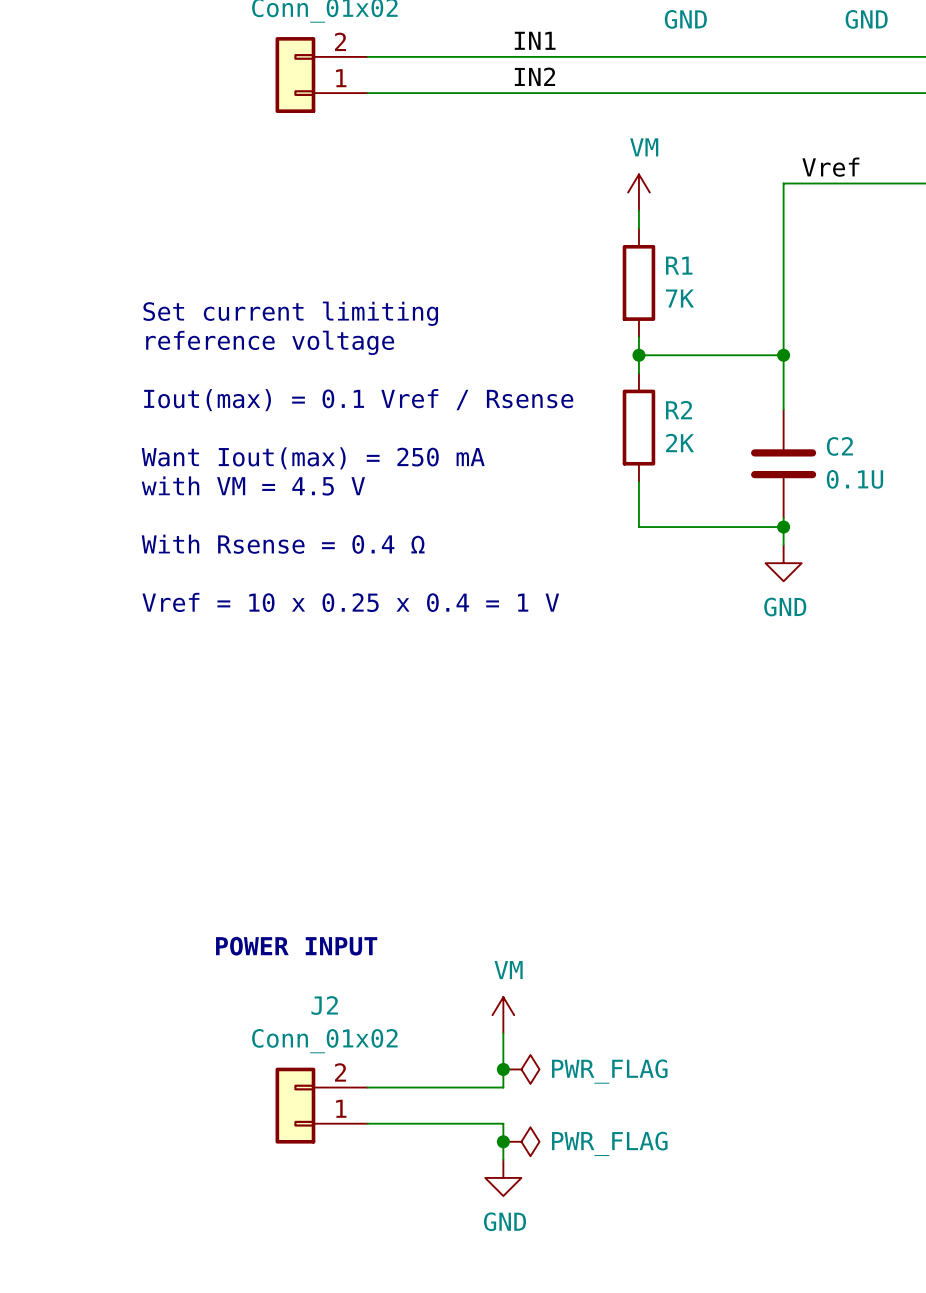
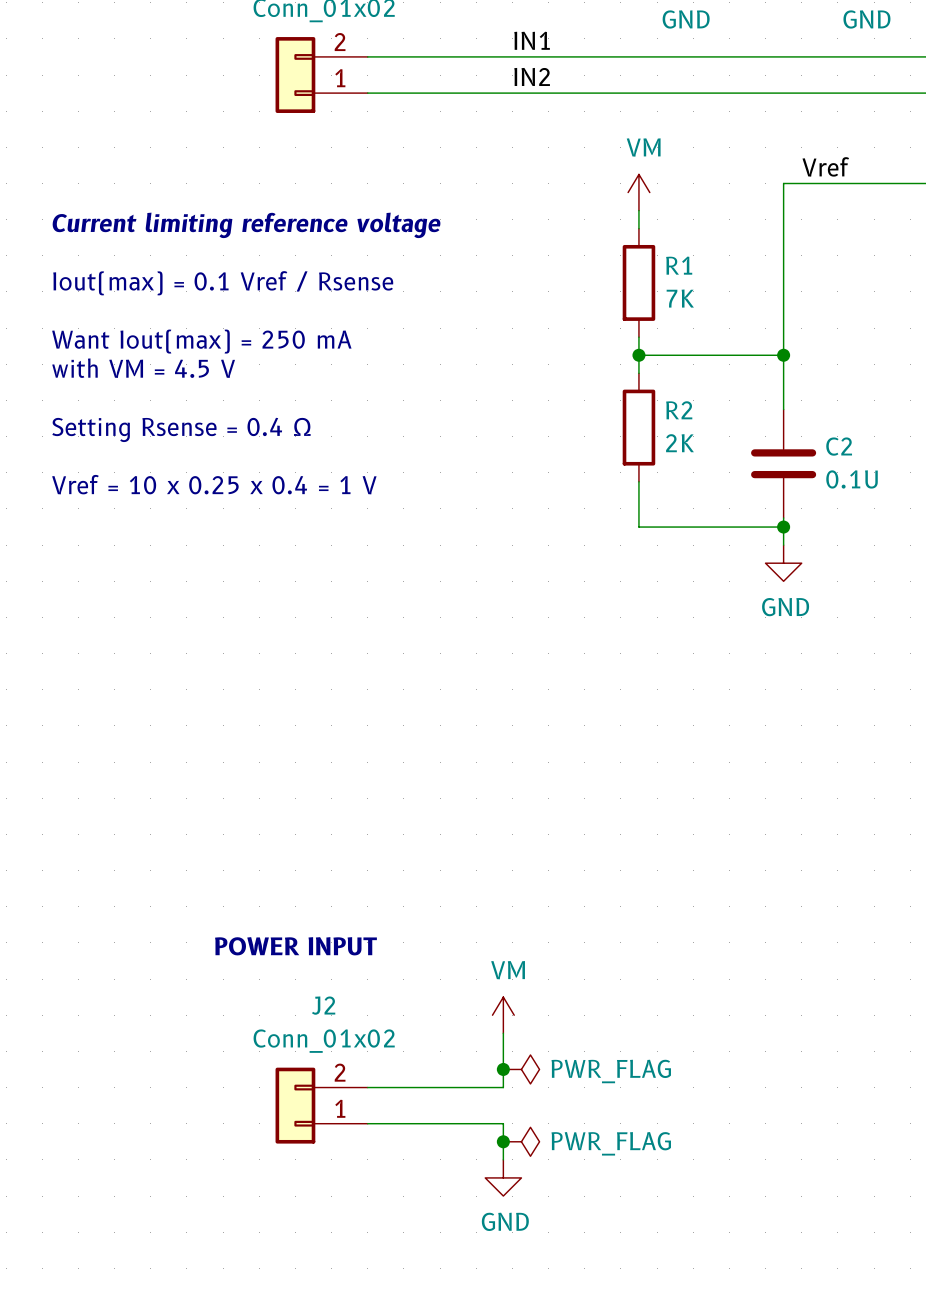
text: none -> Current limiting reference voltage (246, 225)
text: Set current limiting (290, 313) -> none
text: reference voltage (270, 342) -> none
text position: Iout(max) = 0.1 Vref / Rsense (358, 400) -> Iout(max) = 0.1 Vref / Rsense (223, 283)
text: none -> Setting Rsense = 0.4 Ω (181, 429)
text position: Want Iout(max) = 250 mA (313, 458) -> Want Iout(max) = 250 mA (201, 341)
text position: with VM = 4.5 V (253, 485) -> with VM = 4.5 V (143, 368)
text: With Rsense = 0.4 Ω (283, 544) -> none
text position: Vref = 10 x 0.25 x 0.4 = 1 V (350, 602) -> Vref = 10 x 0.25 x 0.4 = 1 V (214, 484)

